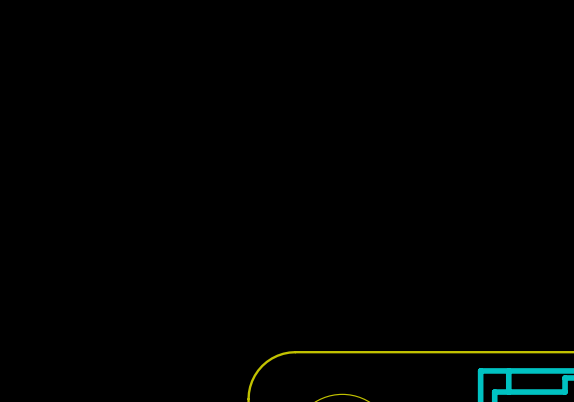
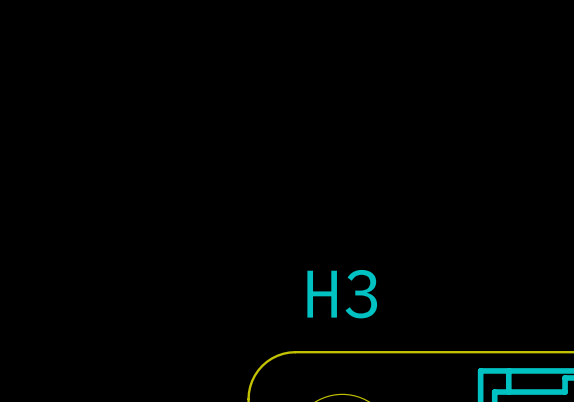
H3 name: none -> H3 (342, 294)

